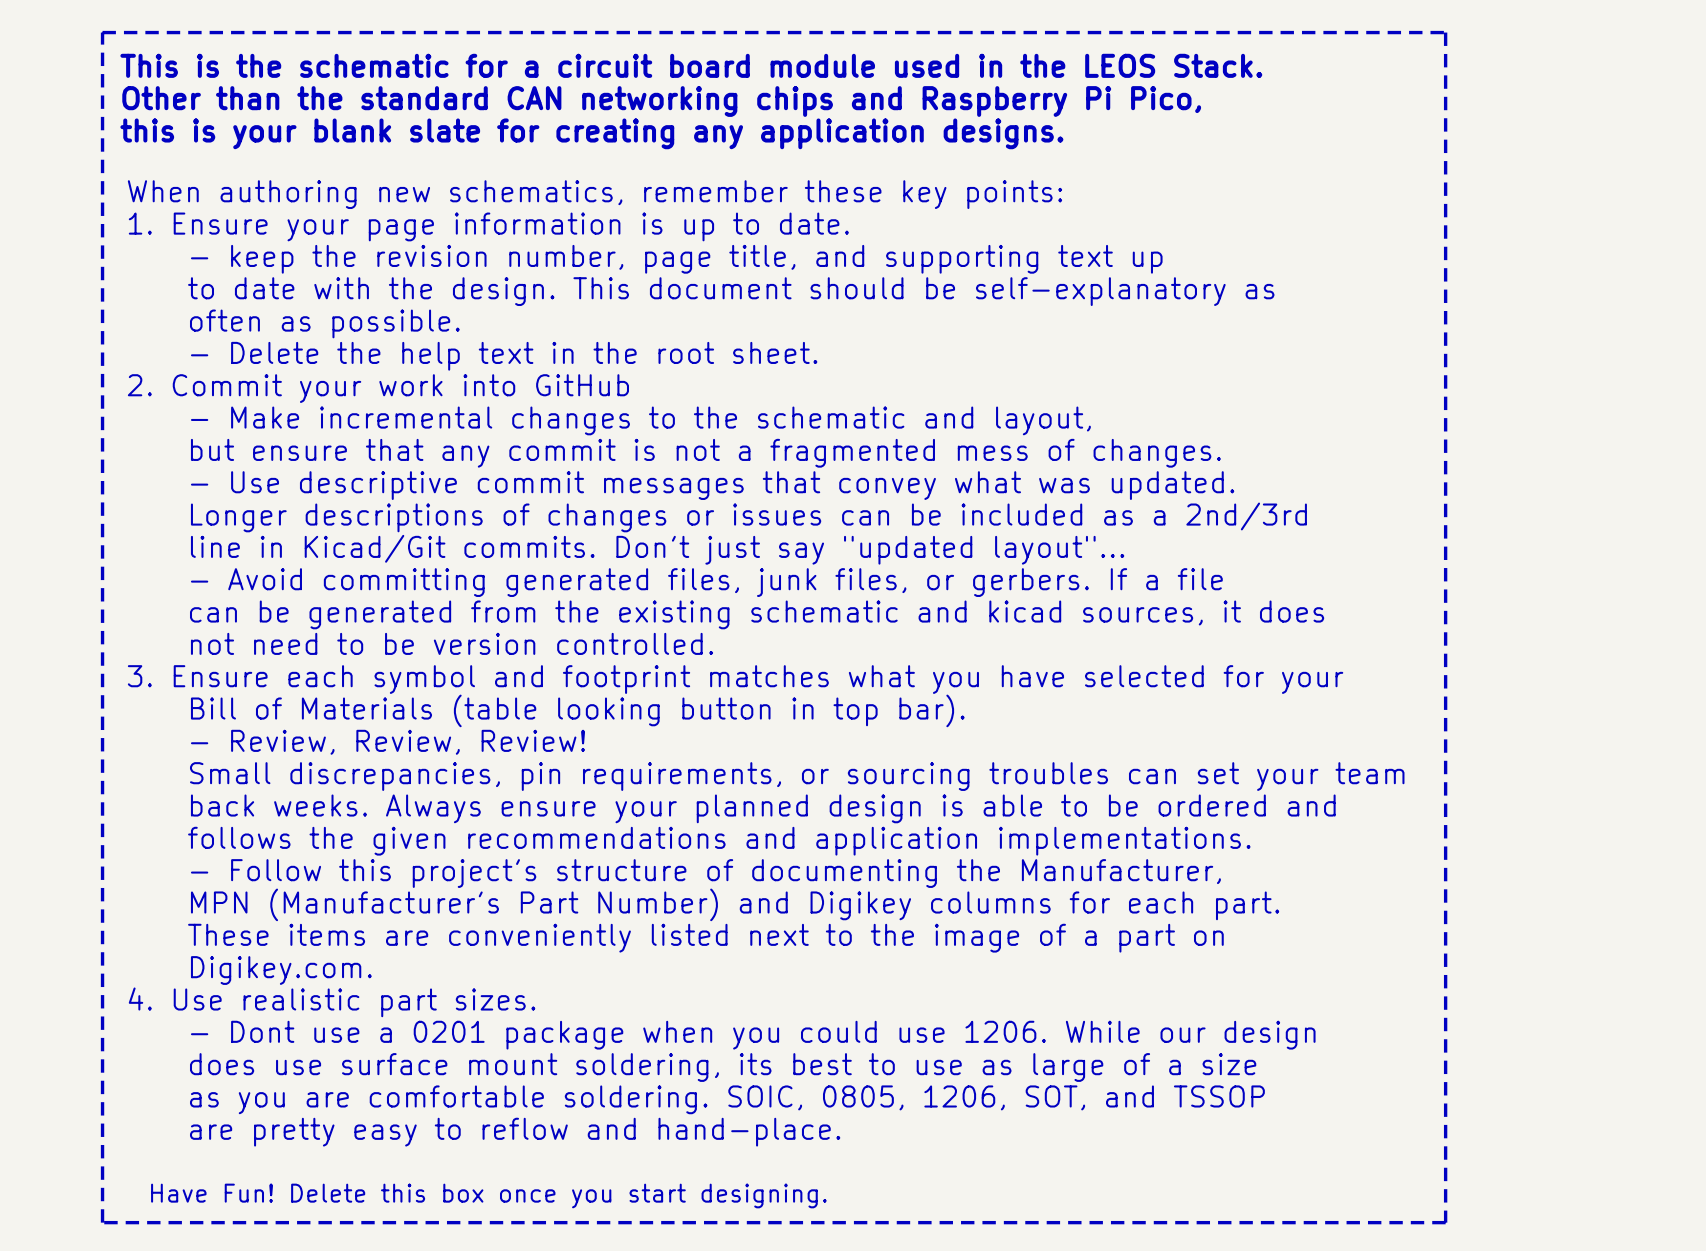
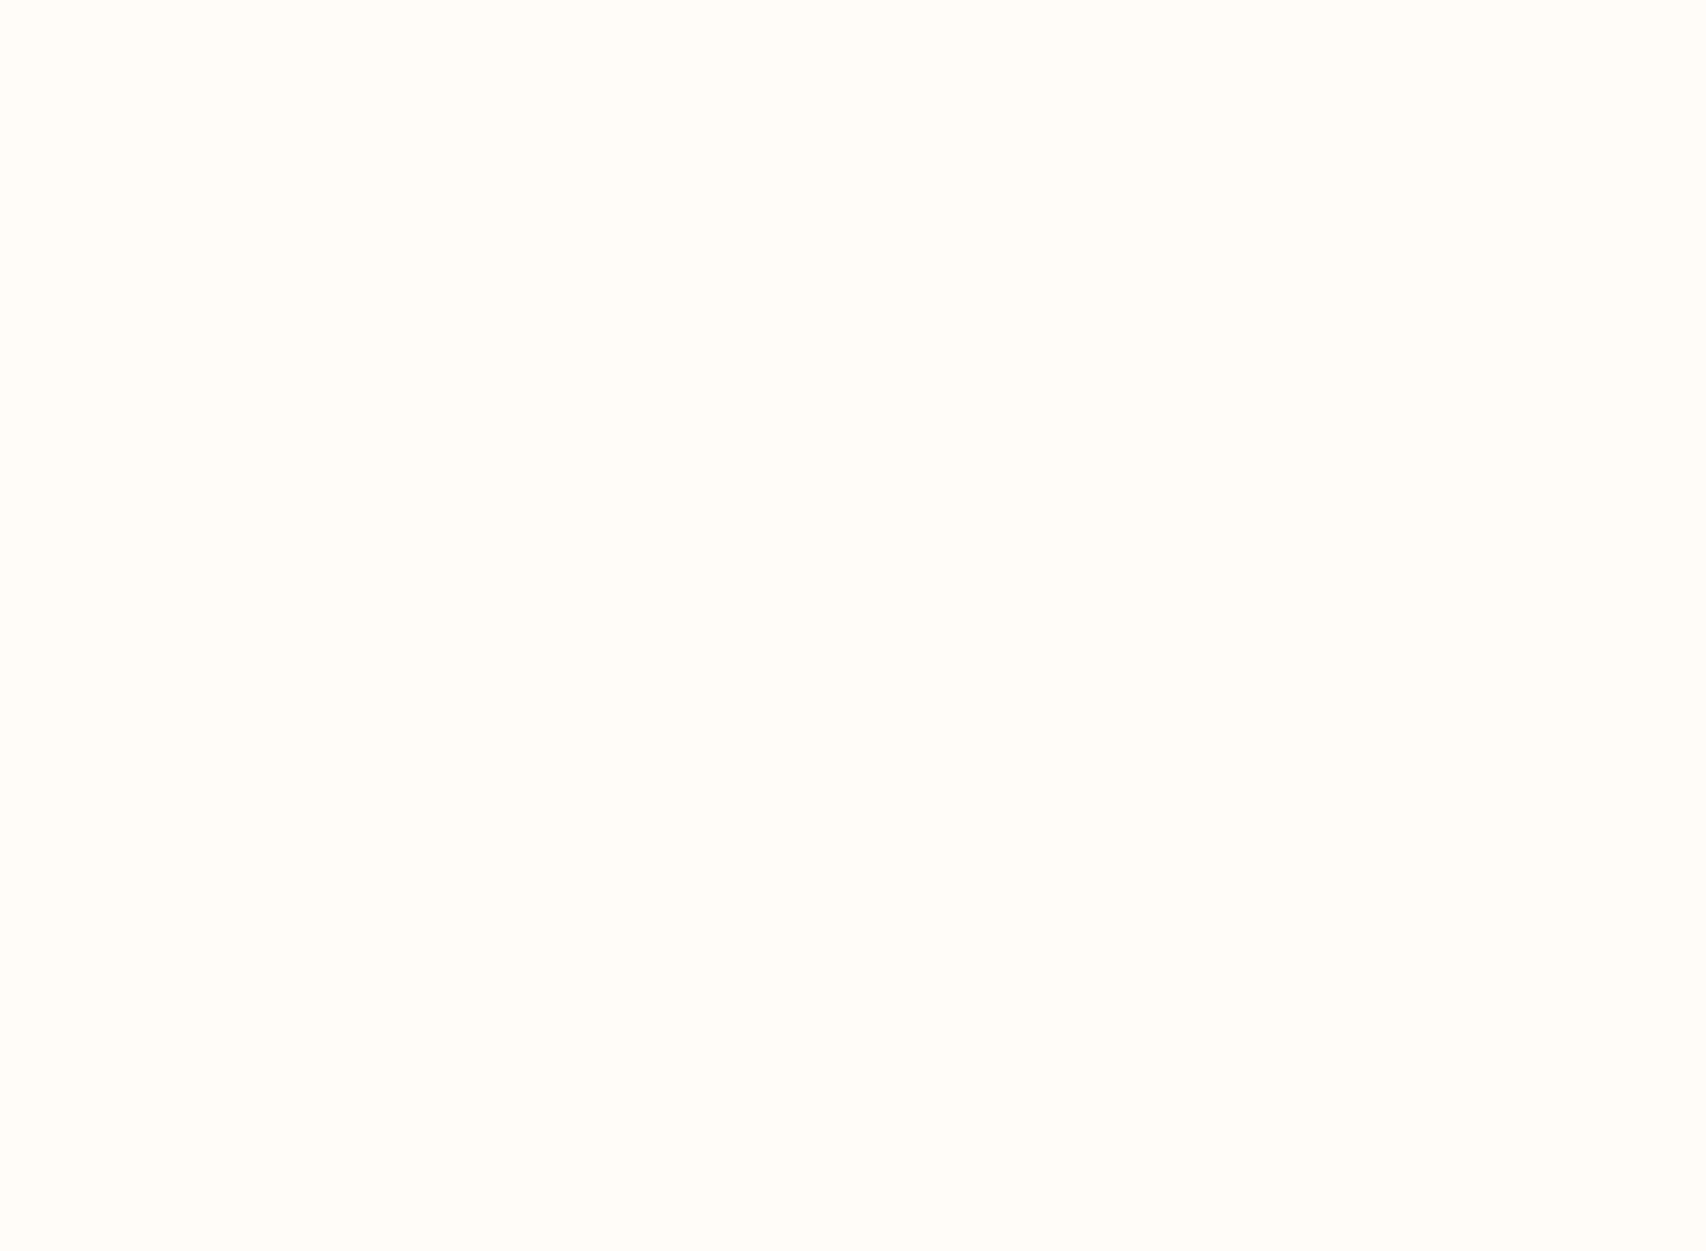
line: (102, 32) (1445, 32) (1445, 1222) (102, 1222) (102, 32) -> none
text: This is the schematic for a circuit board module used in the LEOS Stack. (691, 65) -> none
text: Other than the standard CAN networking chips and Raspberry Pi Pico, (661, 101) -> none
text: this is your blank slate for creating any application designs. (591, 133) -> none
text: When authoring new schematics, remember these key points: (594, 194) -> none
text: 1. Ensure your page information is up to date. (488, 226) -> none
text: - keep the revision number, page title, and supporting text up (676, 259) -> none
text: to date with the design. This document should be self-explanatory as (731, 291) -> none
text: often as possible. (324, 323) -> none
text: - Delete the help text in the root sheet. (504, 356) -> none
text: 2. Commit your work into GitHub (378, 388) -> none
text: - Make incremental changes to the schematic and layout, (640, 420) -> none
text: but ensure that any commit is not a fragmented mess of changes. (705, 453) -> none
text: - Use descriptive commit messages that convey what was updated. (712, 485) -> none
text: Longer descriptions of changes or issues can be included as a 2nd/3rd (748, 517) -> none
text: line in Kicad/Git commits. Don't just say "updated layout"... (657, 549) -> none
text: - Avoid committing generated files, junk files, or gerbers. If a file (706, 582) -> none
text: can be generated from the existing schematic and kicad sources, it does (757, 614) -> none
text: not need to be version controlled. (452, 643) -> none
text: 3. Ensure each symbol and footprint matches what you have selected for your (735, 679) -> none
text: Bill of Materials (table looking button in top bar). (577, 710) -> none
text: - Review, Review, Review! (387, 742) -> none
text: Small discrepancies, pin requirements, or sourcing troubles can set your team (797, 776) -> none
text: back weeks. Always ensure your planned design is able to be ordered and (763, 808) -> none
text: follows the given recommendations and application implementations. (719, 841) -> none
text: - Follow this project's structure of documenting the Manufacturer, (705, 873) -> none
text: MPN (Manufacturer's Part Number) and Digikey columns for each part. (735, 904) -> none
text: These items are conveniently listed next to the image of a part on (705, 938) -> none
text: Digikey.com. (281, 970) -> none
text: 4. Use realistic part sizes. (332, 1002) -> none
text: - Dont use a 0201 package when you could use 1206. While our design (753, 1035) -> none
text: does use surface mount soldering, its best to use as large of a size (723, 1067) -> none
text: as you are comfortable soldering. SOIC, 0805, 1206, SOT, and TSSOP (727, 1099) -> none
text: are pretty easy to reflow and hand-place. (515, 1132) -> none
text: Have Fun! Delete this box once you start designing. (488, 1195) -> none

